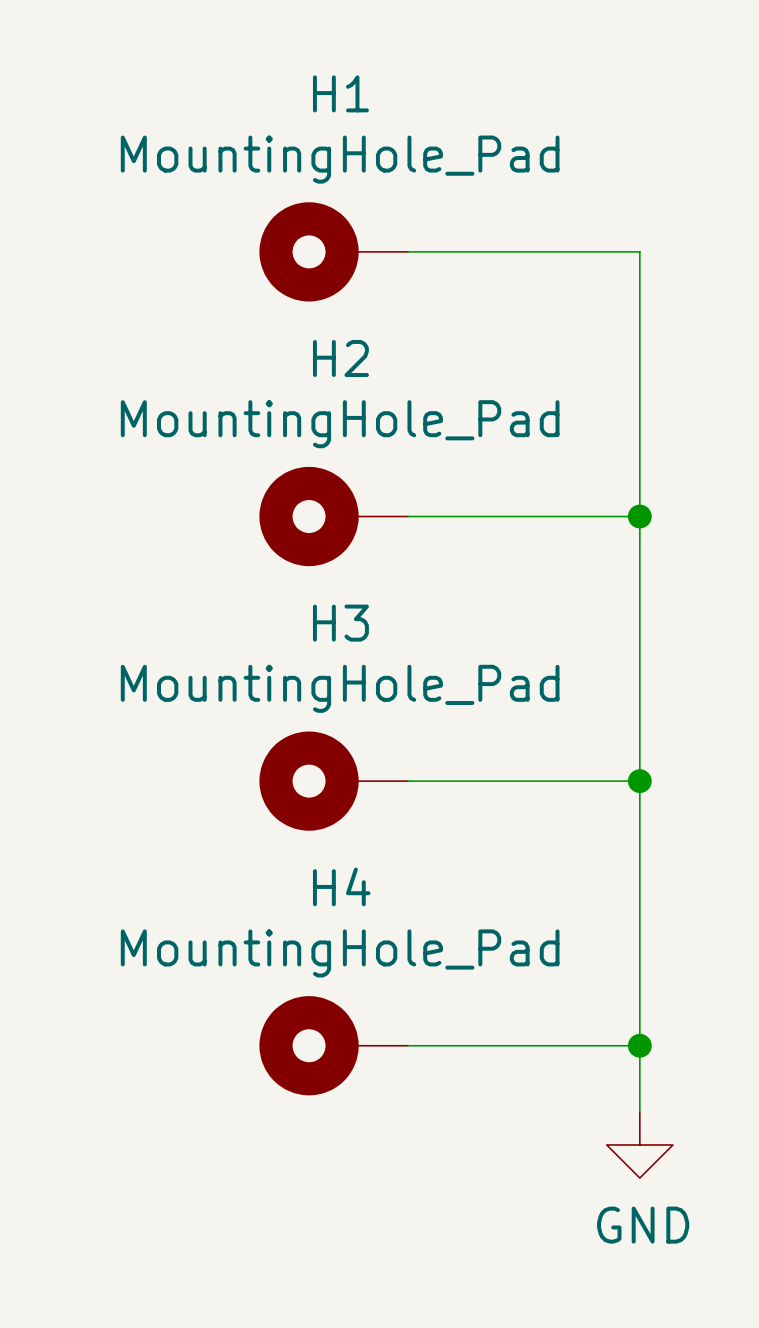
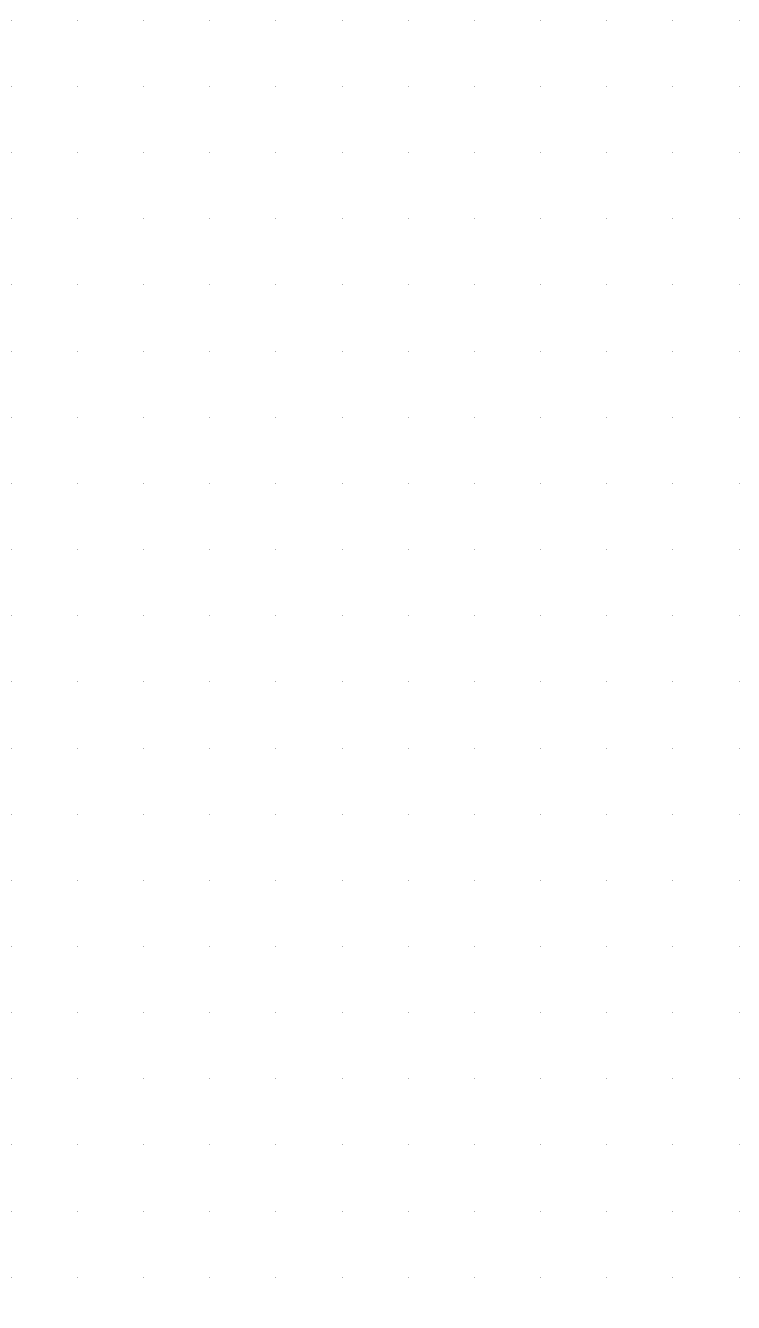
H1: MountingHole_Pad (333, 251) -> none
wire: (408, 251) (639, 251) (639, 1111) -> none
H2: MountingHole_Pad (333, 516) -> none
wire: (408, 516) (639, 516) -> none
junction: (639, 516) -> none
H3: MountingHole_Pad (333, 781) -> none
wire: (408, 781) (639, 781) -> none
junction: (639, 781) -> none
H4: MountingHole_Pad (333, 1045) -> none
wire: (408, 1045) (639, 1045) -> none
junction: (639, 1045) -> none
power symbol: GND (639, 1144) -> none

